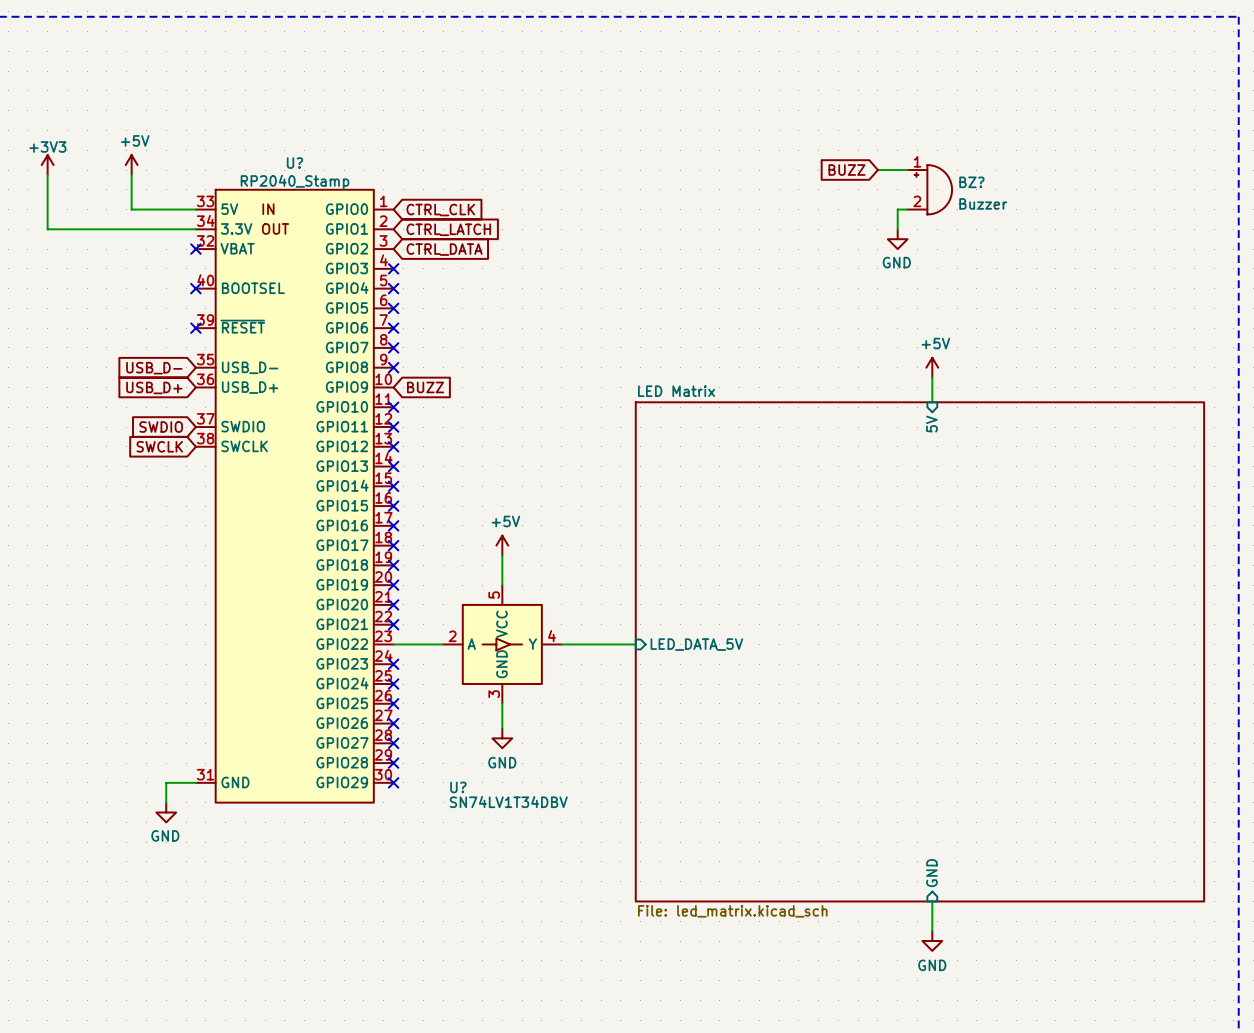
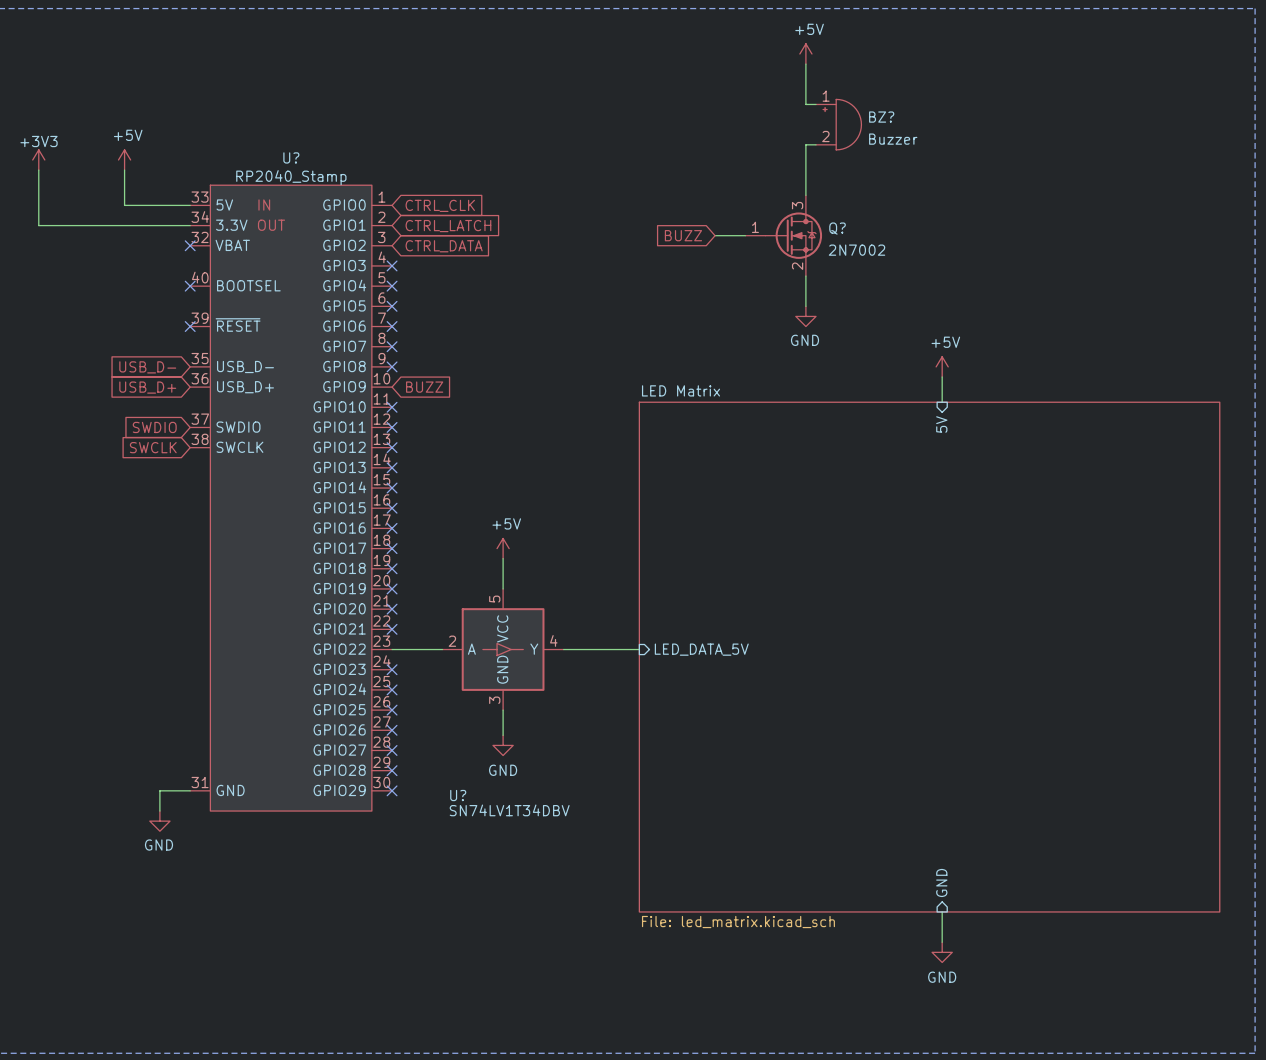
power symbol: none -> +5V (805, 53)
wire: none -> (805, 64) (805, 104) (816, 104)
wire: none -> (816, 144) (805, 144) (805, 195)
global label position: BUZZ (846, 170) -> BUZZ (683, 235)
wire: (877, 170) (907, 170) -> (715, 235) (745, 235)
BZ? position: (929, 189) -> (838, 124)
wire: (907, 209) (897, 209) (897, 229) -> none
Q?: none -> 2N7002 (783, 235)
power symbol position: GND (897, 239) -> GND (805, 316)
wire: none -> (805, 276) (805, 306)

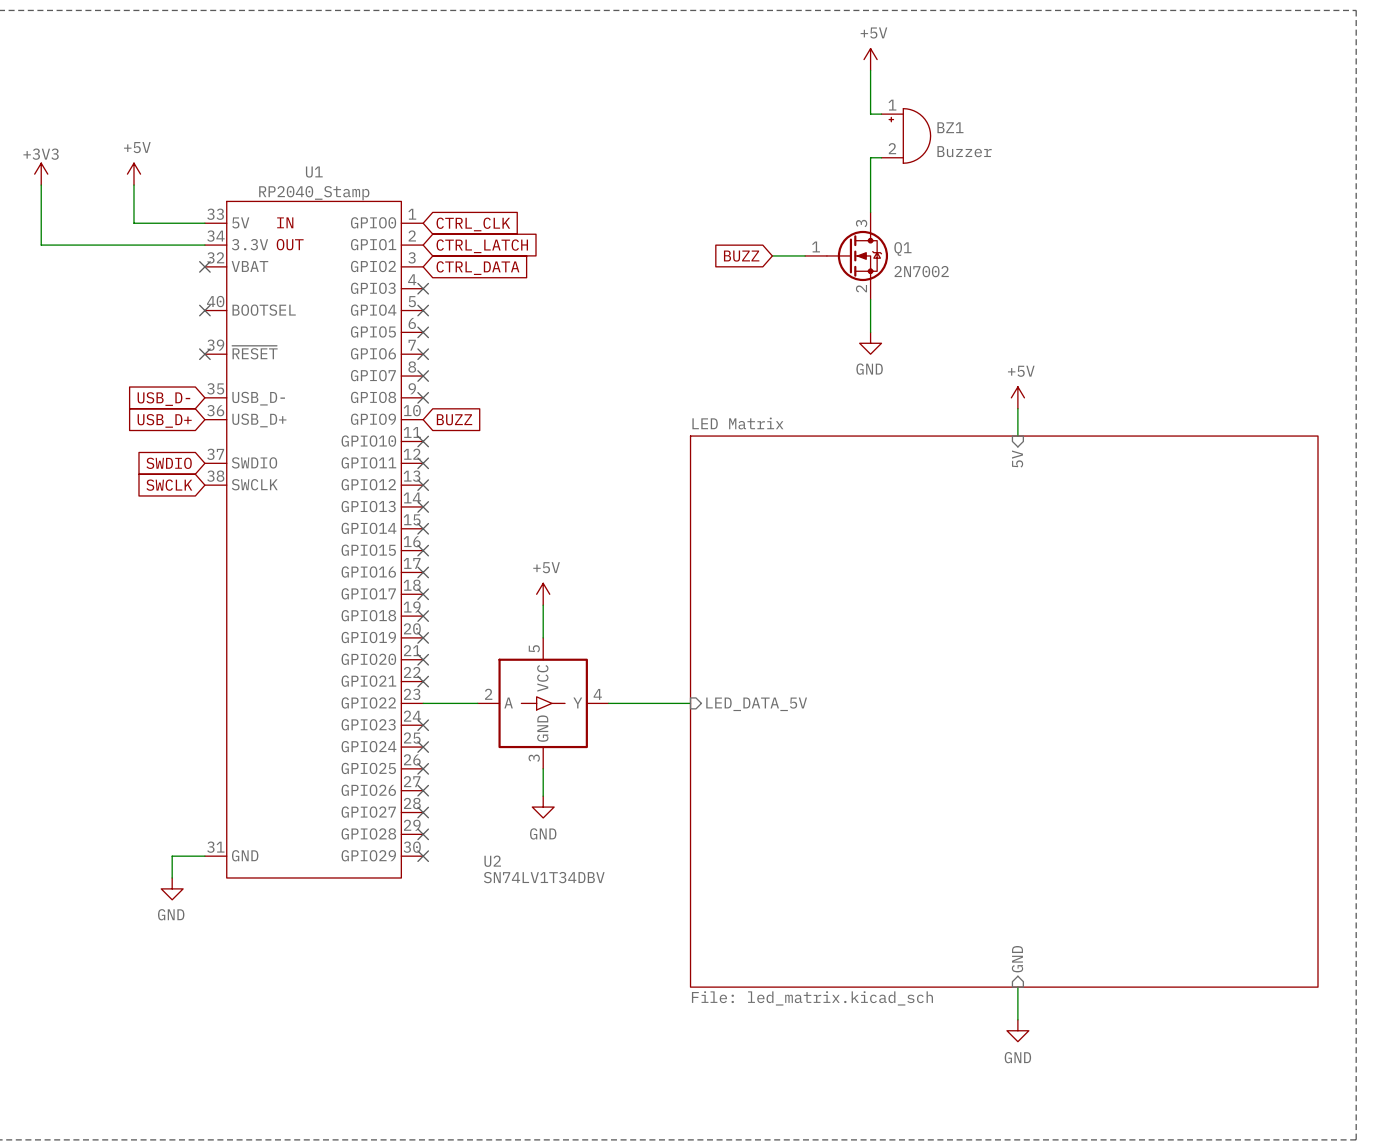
BZ? name: BZ? (881, 117) -> BZ1 (950, 127)
U? name: U? (291, 157) -> U1 (314, 172)
Q? name: Q? (837, 228) -> Q1 (902, 248)
U? name: U? (458, 795) -> U2 (492, 861)

